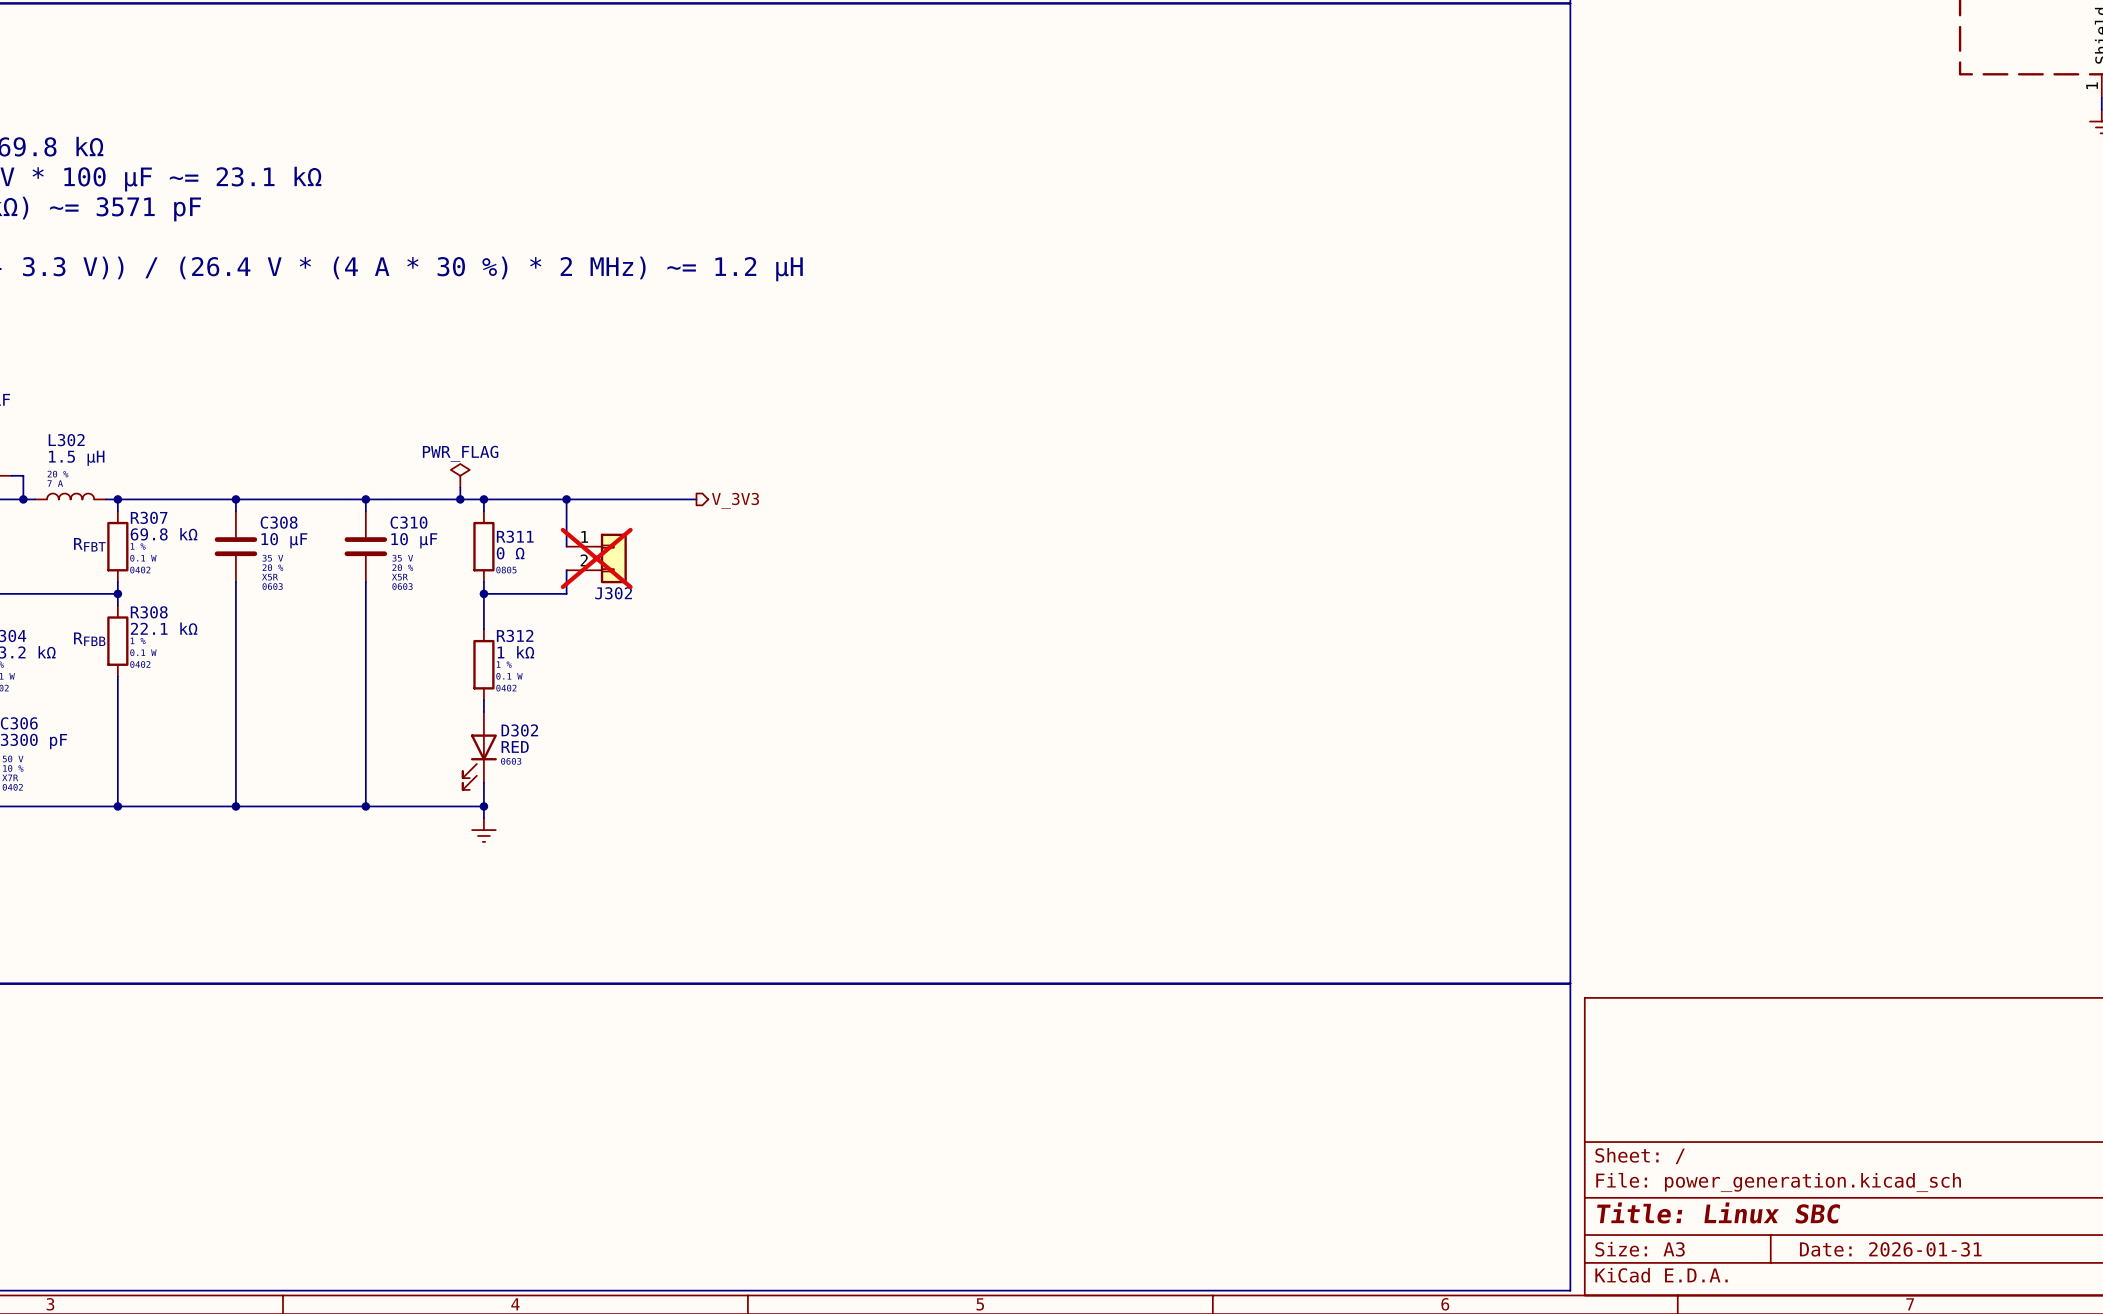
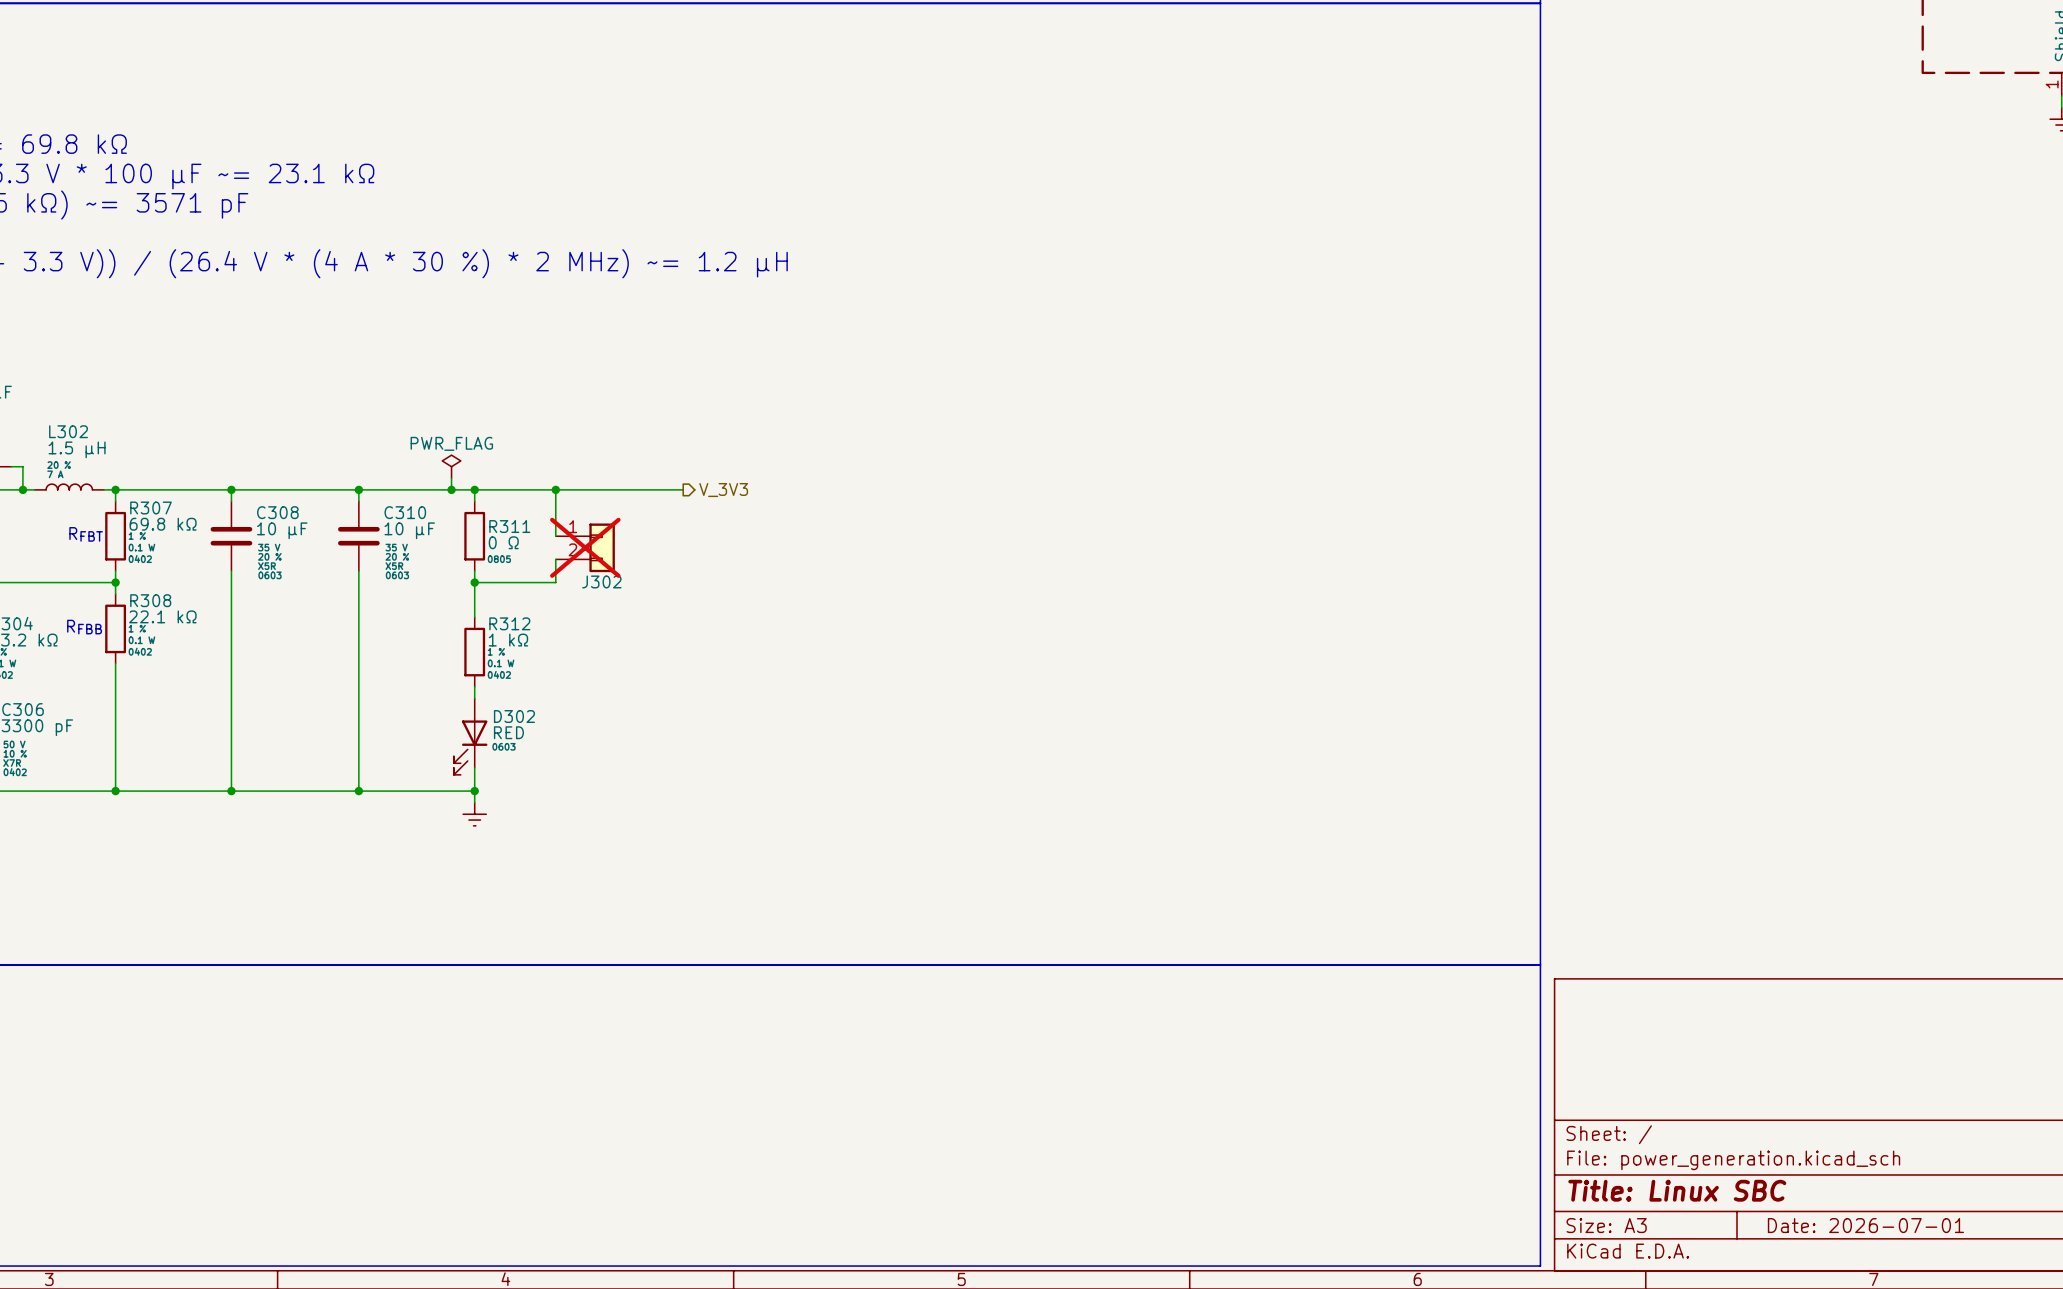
title block: Date: 2026-01-31 (1890, 1249) -> Date: 2026-07-01 (1865, 1225)

